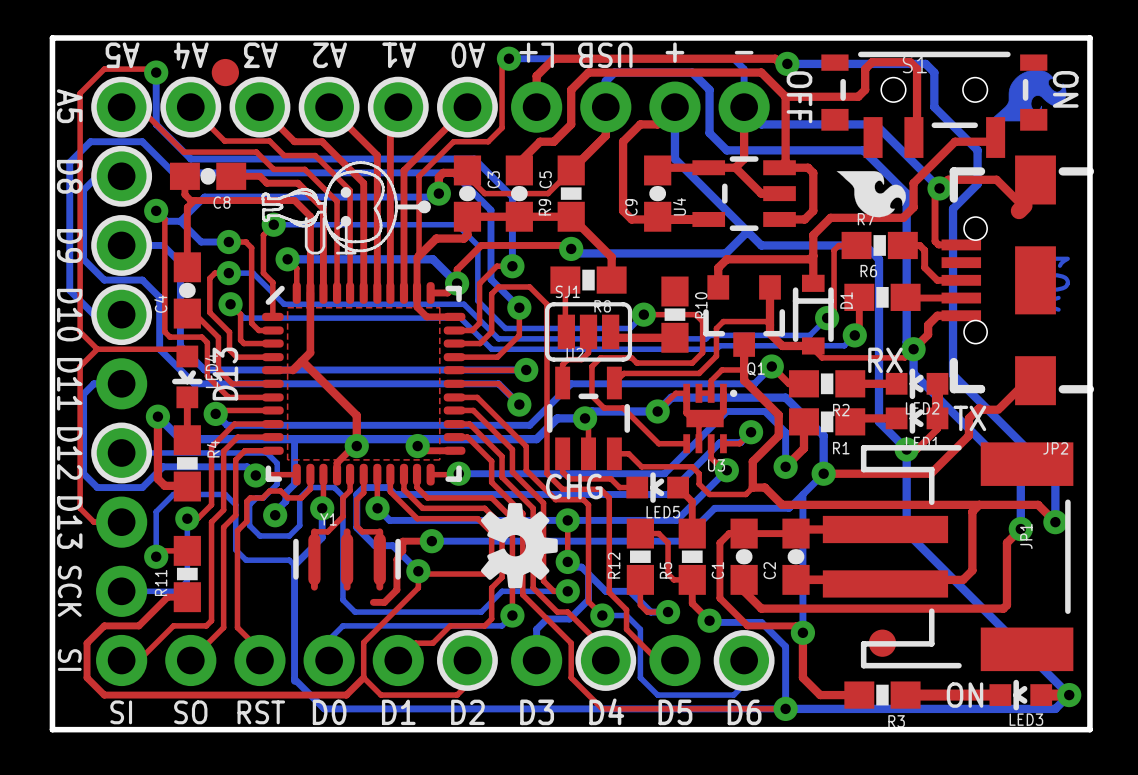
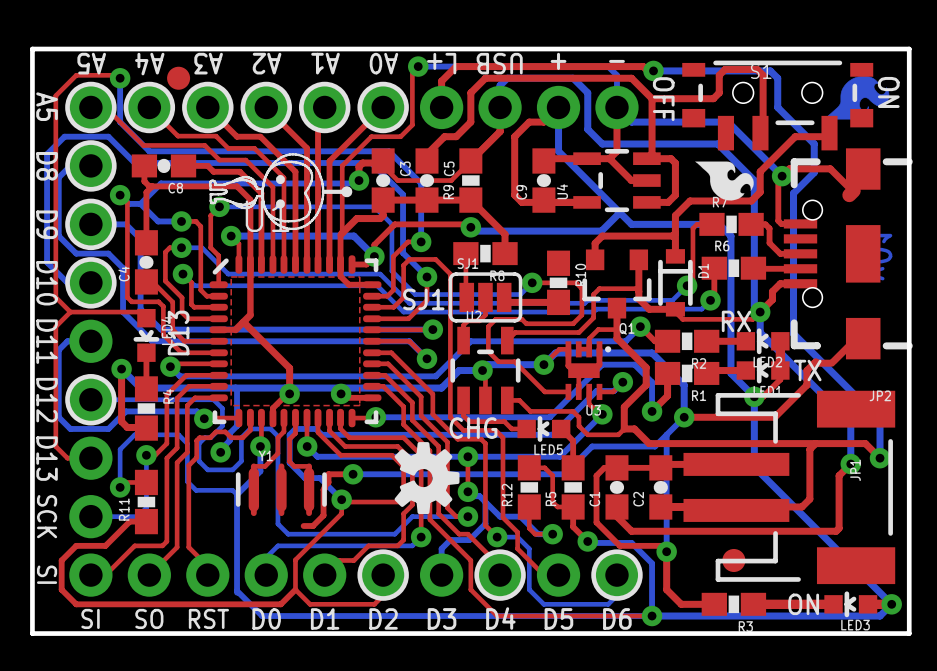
text: none -> SJ1 (423, 299)

